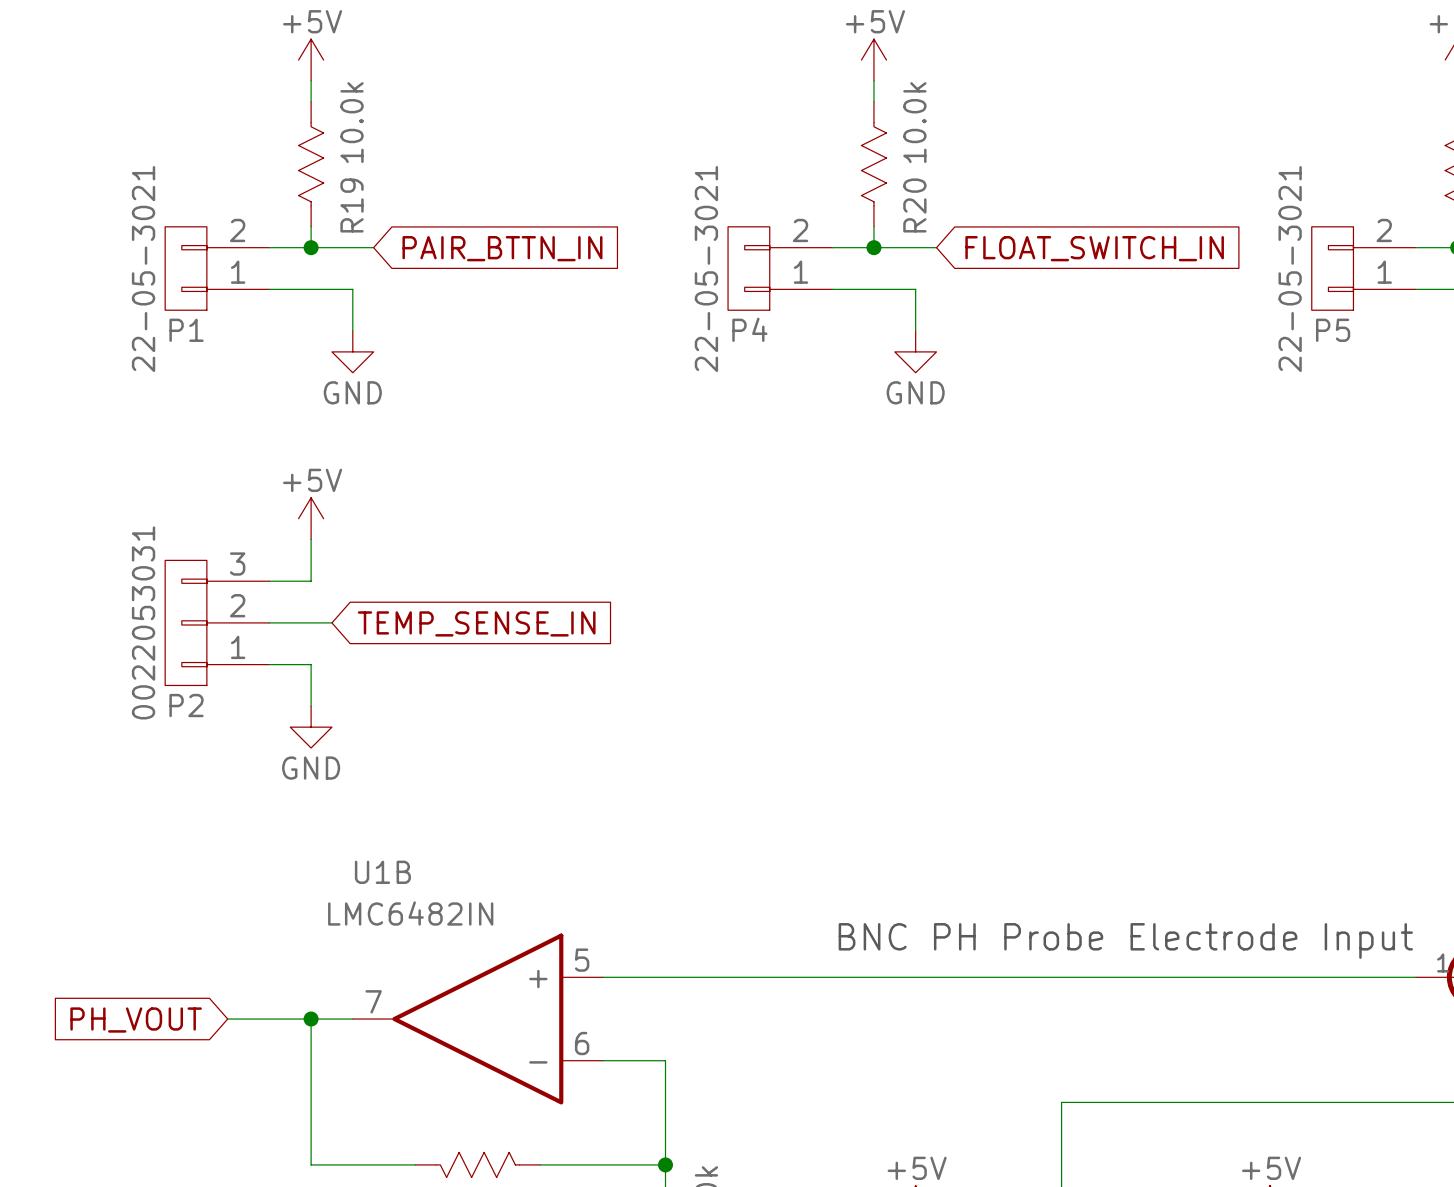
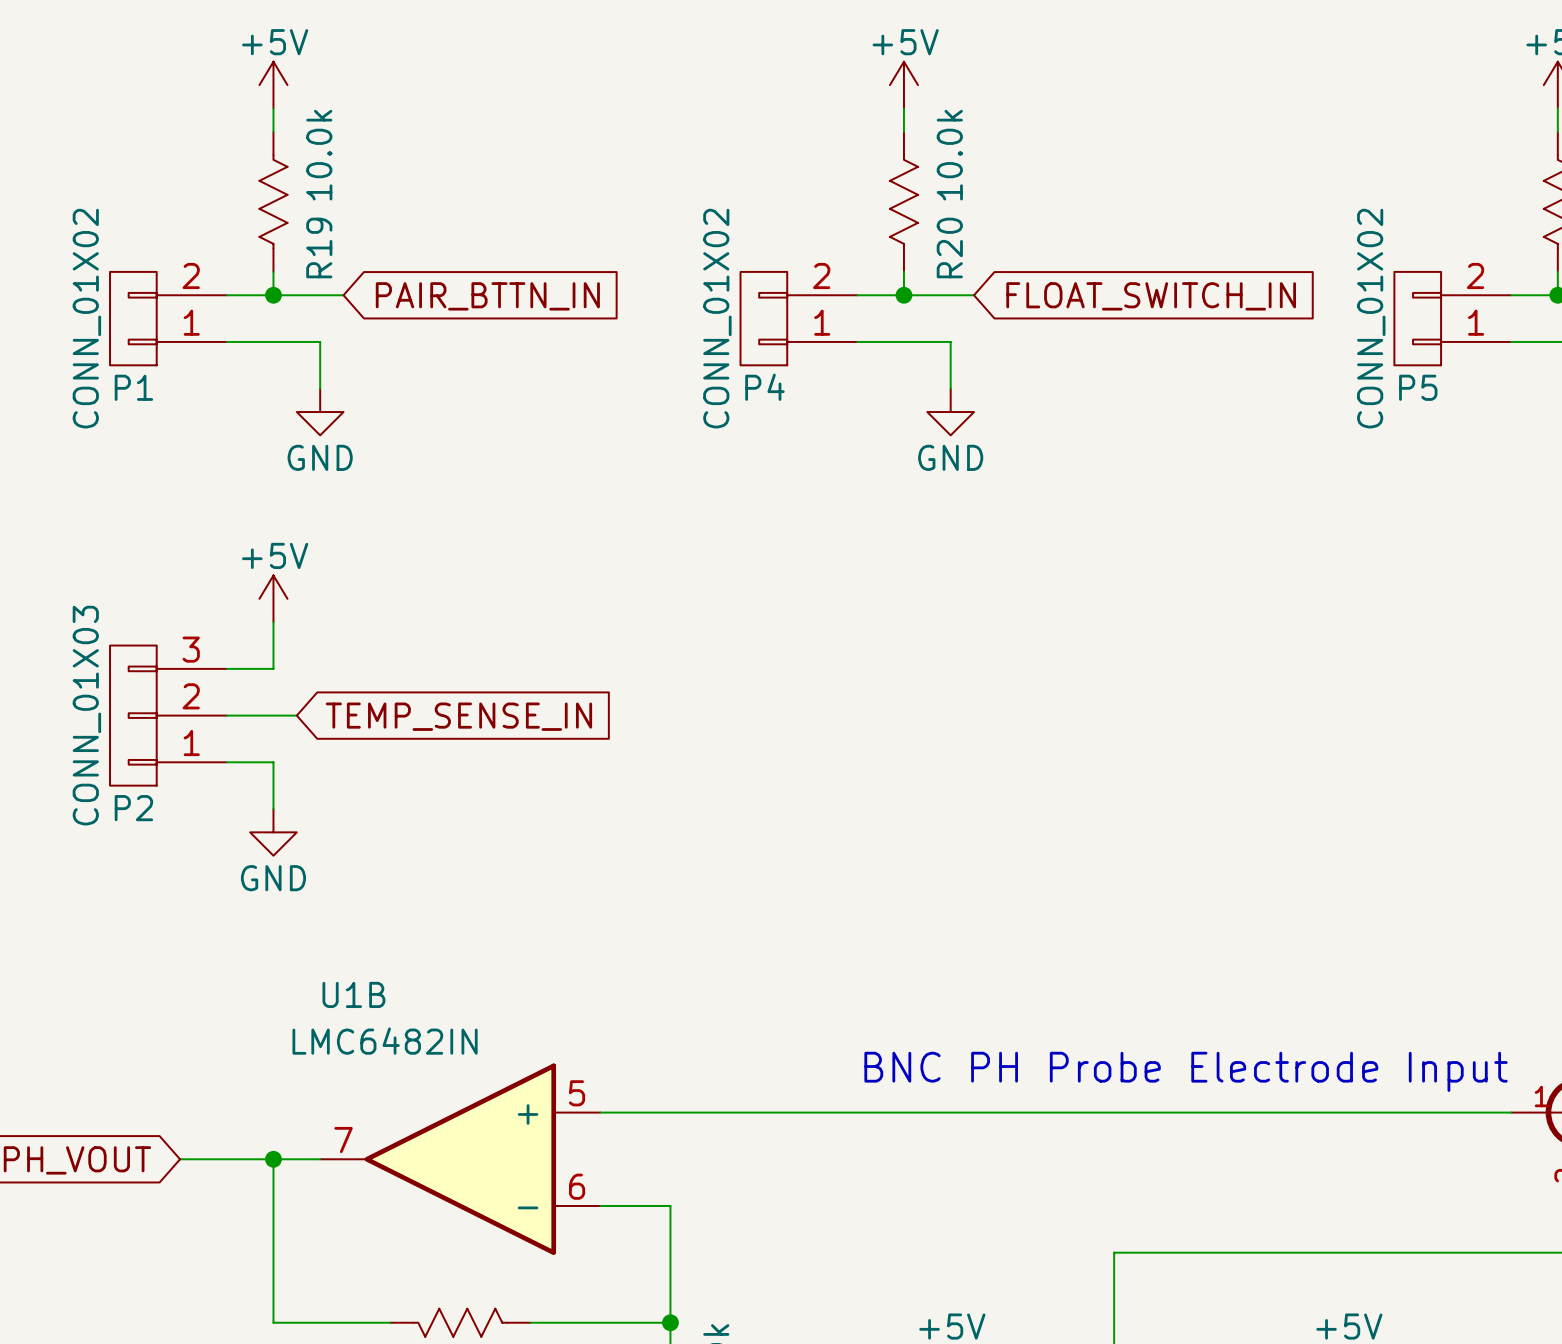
P1 value: 22-05-3021 (143, 269) -> CONN_01X02 (86, 318)
P4 value: 22-05-3021 (706, 269) -> CONN_01X02 (717, 318)
P5 value: 22-05-3021 (1290, 269) -> CONN_01X02 (1371, 318)
P2 value: 0022053031 (143, 622) -> CONN_01X03 (86, 715)

